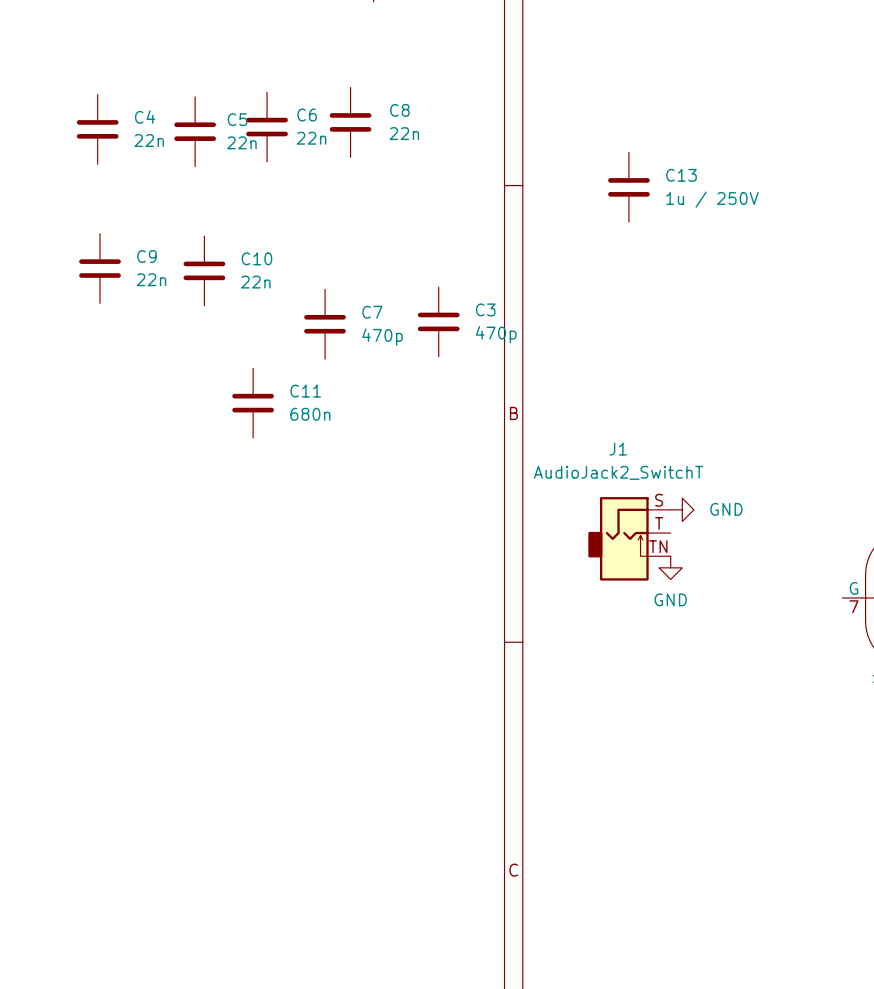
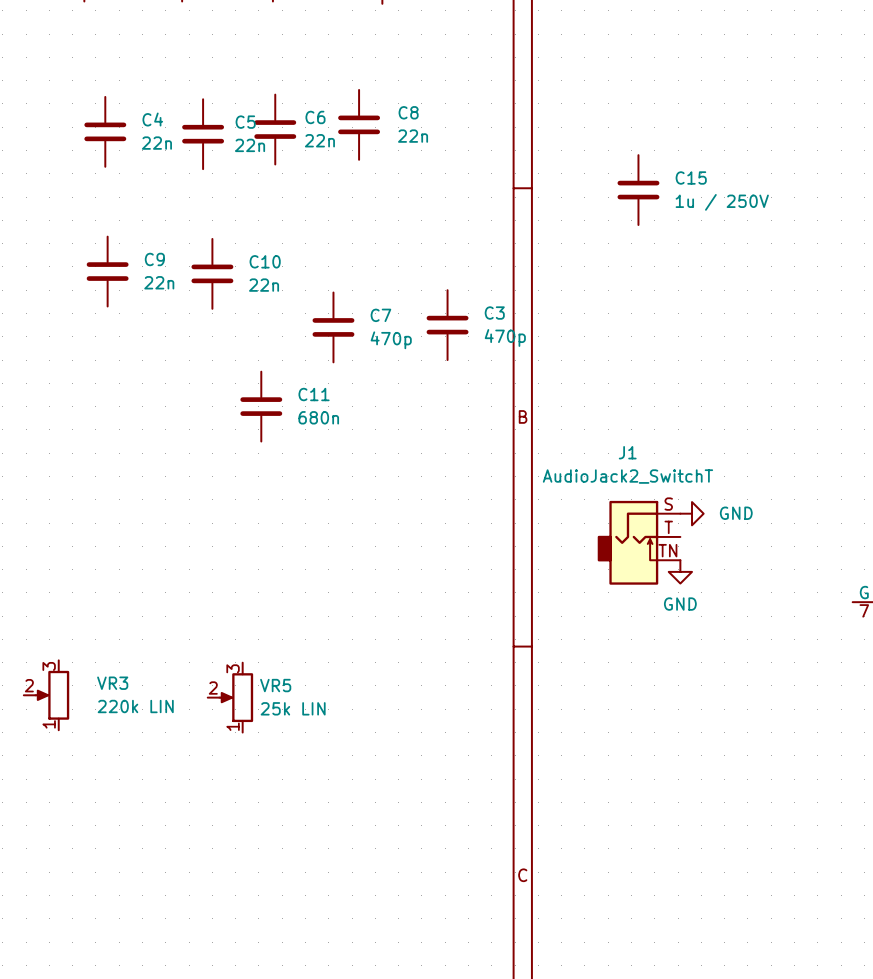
C13 name: C13 (681, 175) -> C15 (691, 177)
VR3: none -> 220k LIN (46, 695)
VR5: none -> 25k LIN (230, 697)

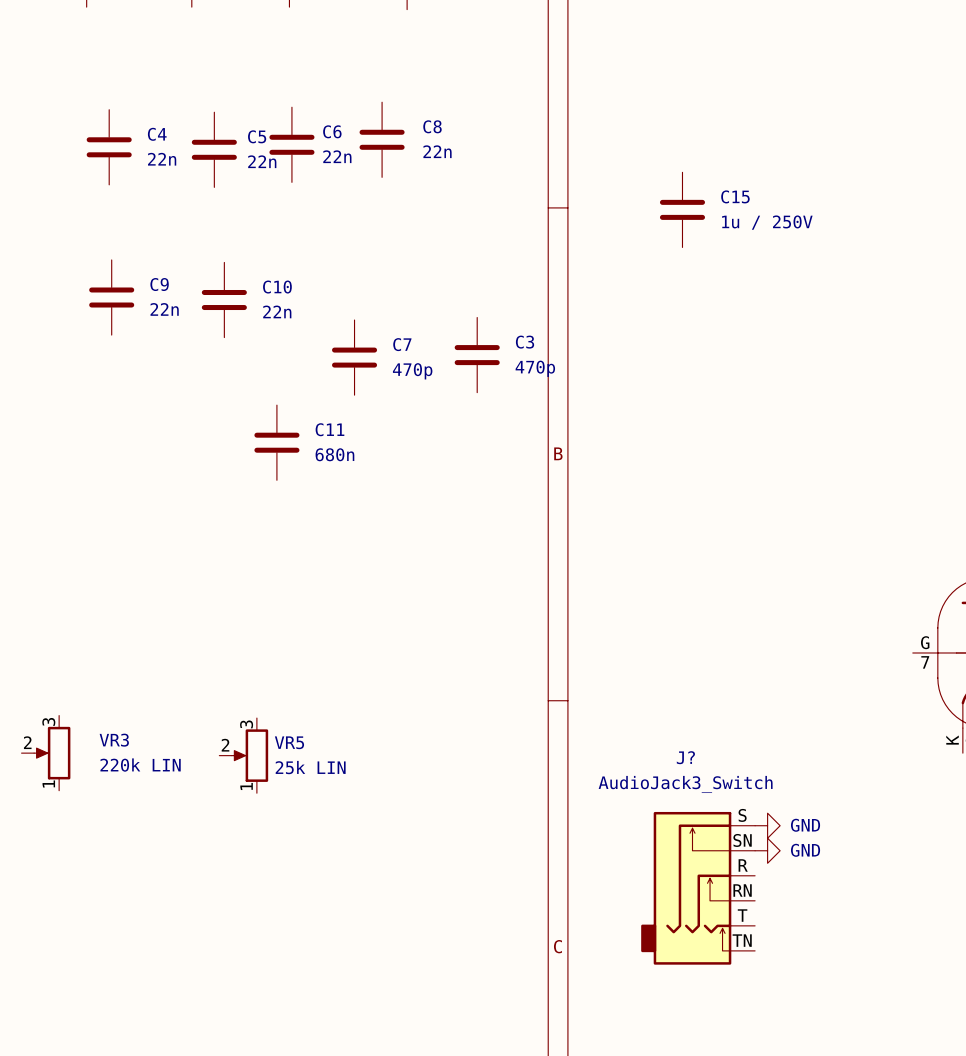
power symbol: GND (692, 513) -> none
J1: AudioJack2_SwitchT (639, 542) -> none
power symbol: GND (680, 571) -> none
power symbol: none -> GND (767, 825)
power symbol: none -> GND (767, 850)
J?: none -> AudioJack3_Switch (698, 888)

